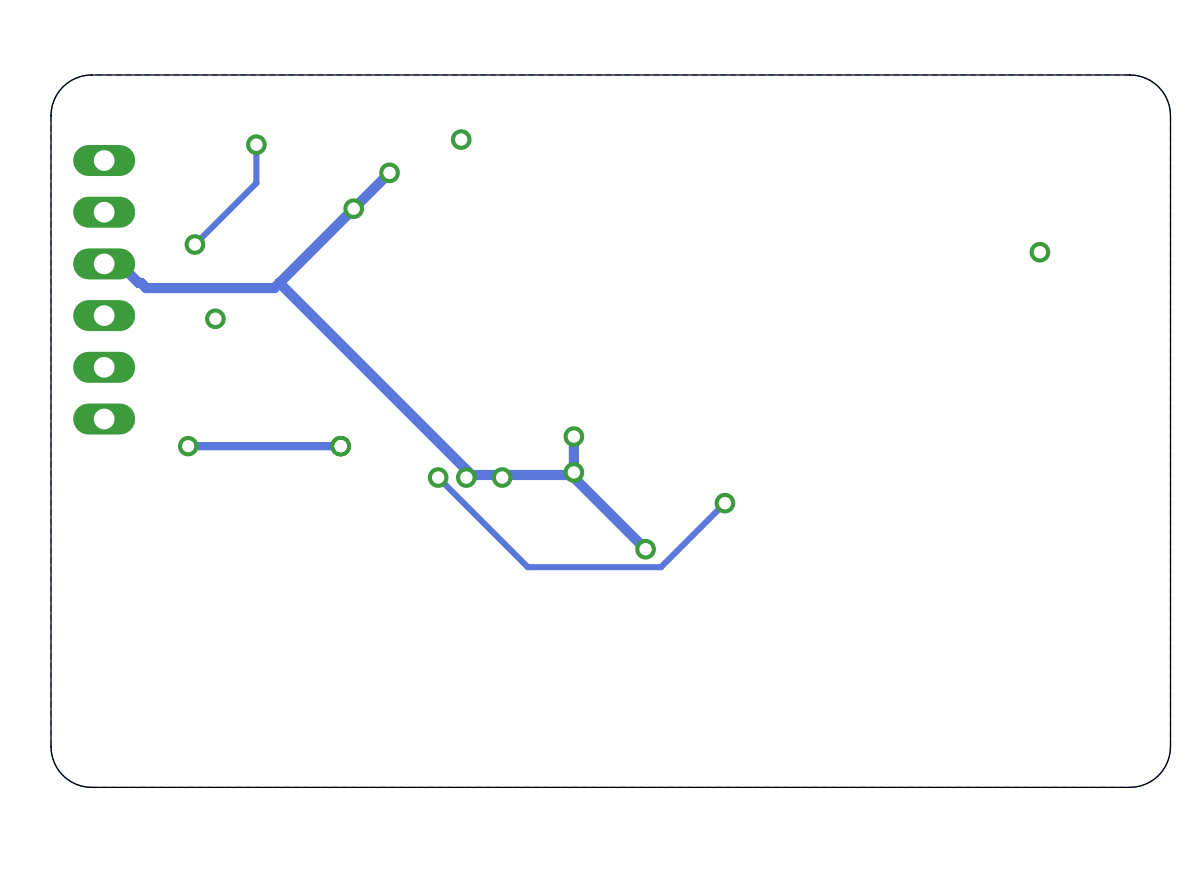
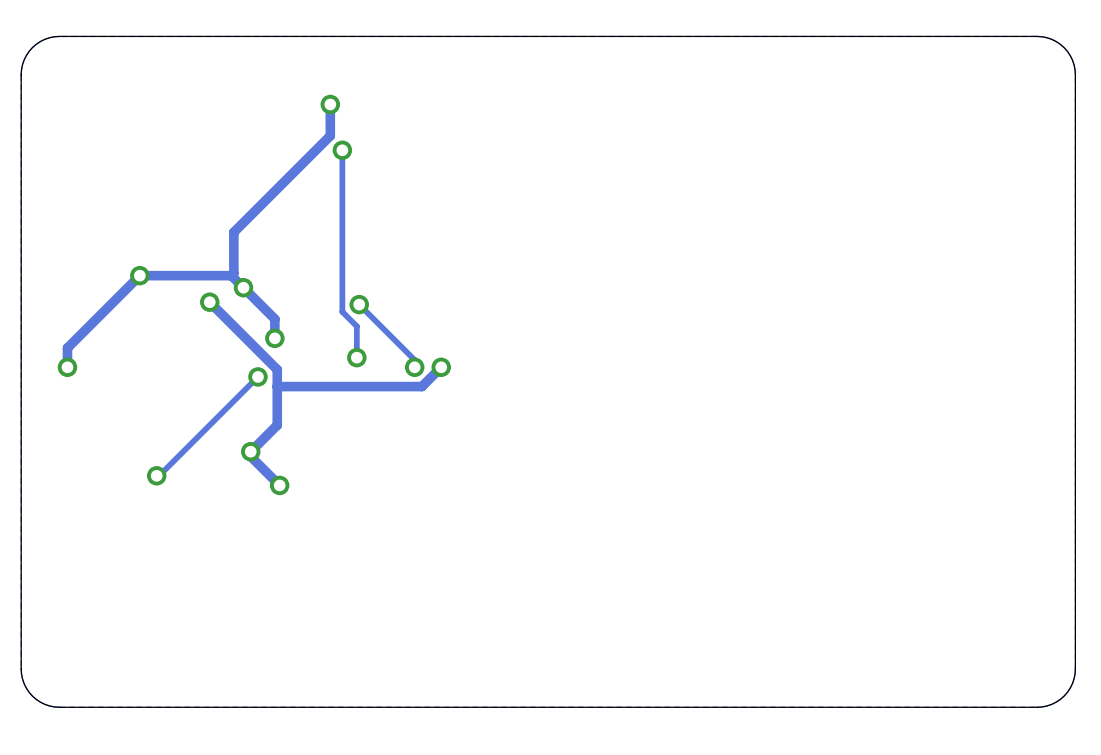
via: (461, 139) -> none
track: (256, 144) (256, 183) (194, 244) -> none
via: (256, 144) -> none
track: none -> (330, 104) (330, 135) (233, 232) (233, 273) (231, 275)
via: none -> (330, 104)
track: (389, 172) (274, 288) (146, 288) (120, 265) (104, 263) -> none
via: (389, 172) -> none
track: none -> (342, 150) (342, 311) (356, 326) (356, 357)
via: none -> (342, 150)
via: (353, 208) -> none
via: (194, 244) -> none
via: (1039, 252) -> none
track: (279, 282) (468, 472) (466, 477) (468, 474) (571, 474) (573, 472) -> none
part: (104, 289) -> none
via: (215, 318) -> none
via: none -> (139, 275)
track: none -> (231, 275) (139, 275) (67, 348) (67, 367)
track: none -> (231, 275) (274, 319) (274, 338)
via: none -> (243, 287)
track: none -> (209, 302) (277, 369) (277, 425) (250, 451) (250, 456) (279, 485)
via: none -> (209, 302)
track: none -> (359, 304) (414, 360) (414, 367)
via: none -> (359, 304)
via: none -> (274, 338)
via: none -> (356, 357)
via: none -> (67, 367)
via: none -> (414, 367)
track: none -> (441, 367) (421, 386) (277, 386)
via: none -> (441, 367)
track: none -> (257, 376) (159, 475) (156, 475)
via: none -> (257, 376)
track: (573, 436) (573, 477) (645, 549) -> none
via: (573, 436) -> none
via: (188, 446) -> none
track: (340, 446) (188, 446) -> none
via: (340, 446) -> none
via: (573, 472) -> none
track: (438, 477) (527, 567) (660, 567) (724, 503) -> none
via: (438, 477) -> none
via: (466, 477) -> none
via: (502, 477) -> none
via: (724, 503) -> none
via: none -> (250, 451)
via: none -> (156, 475)
via: (645, 549) -> none
via: none -> (279, 485)

